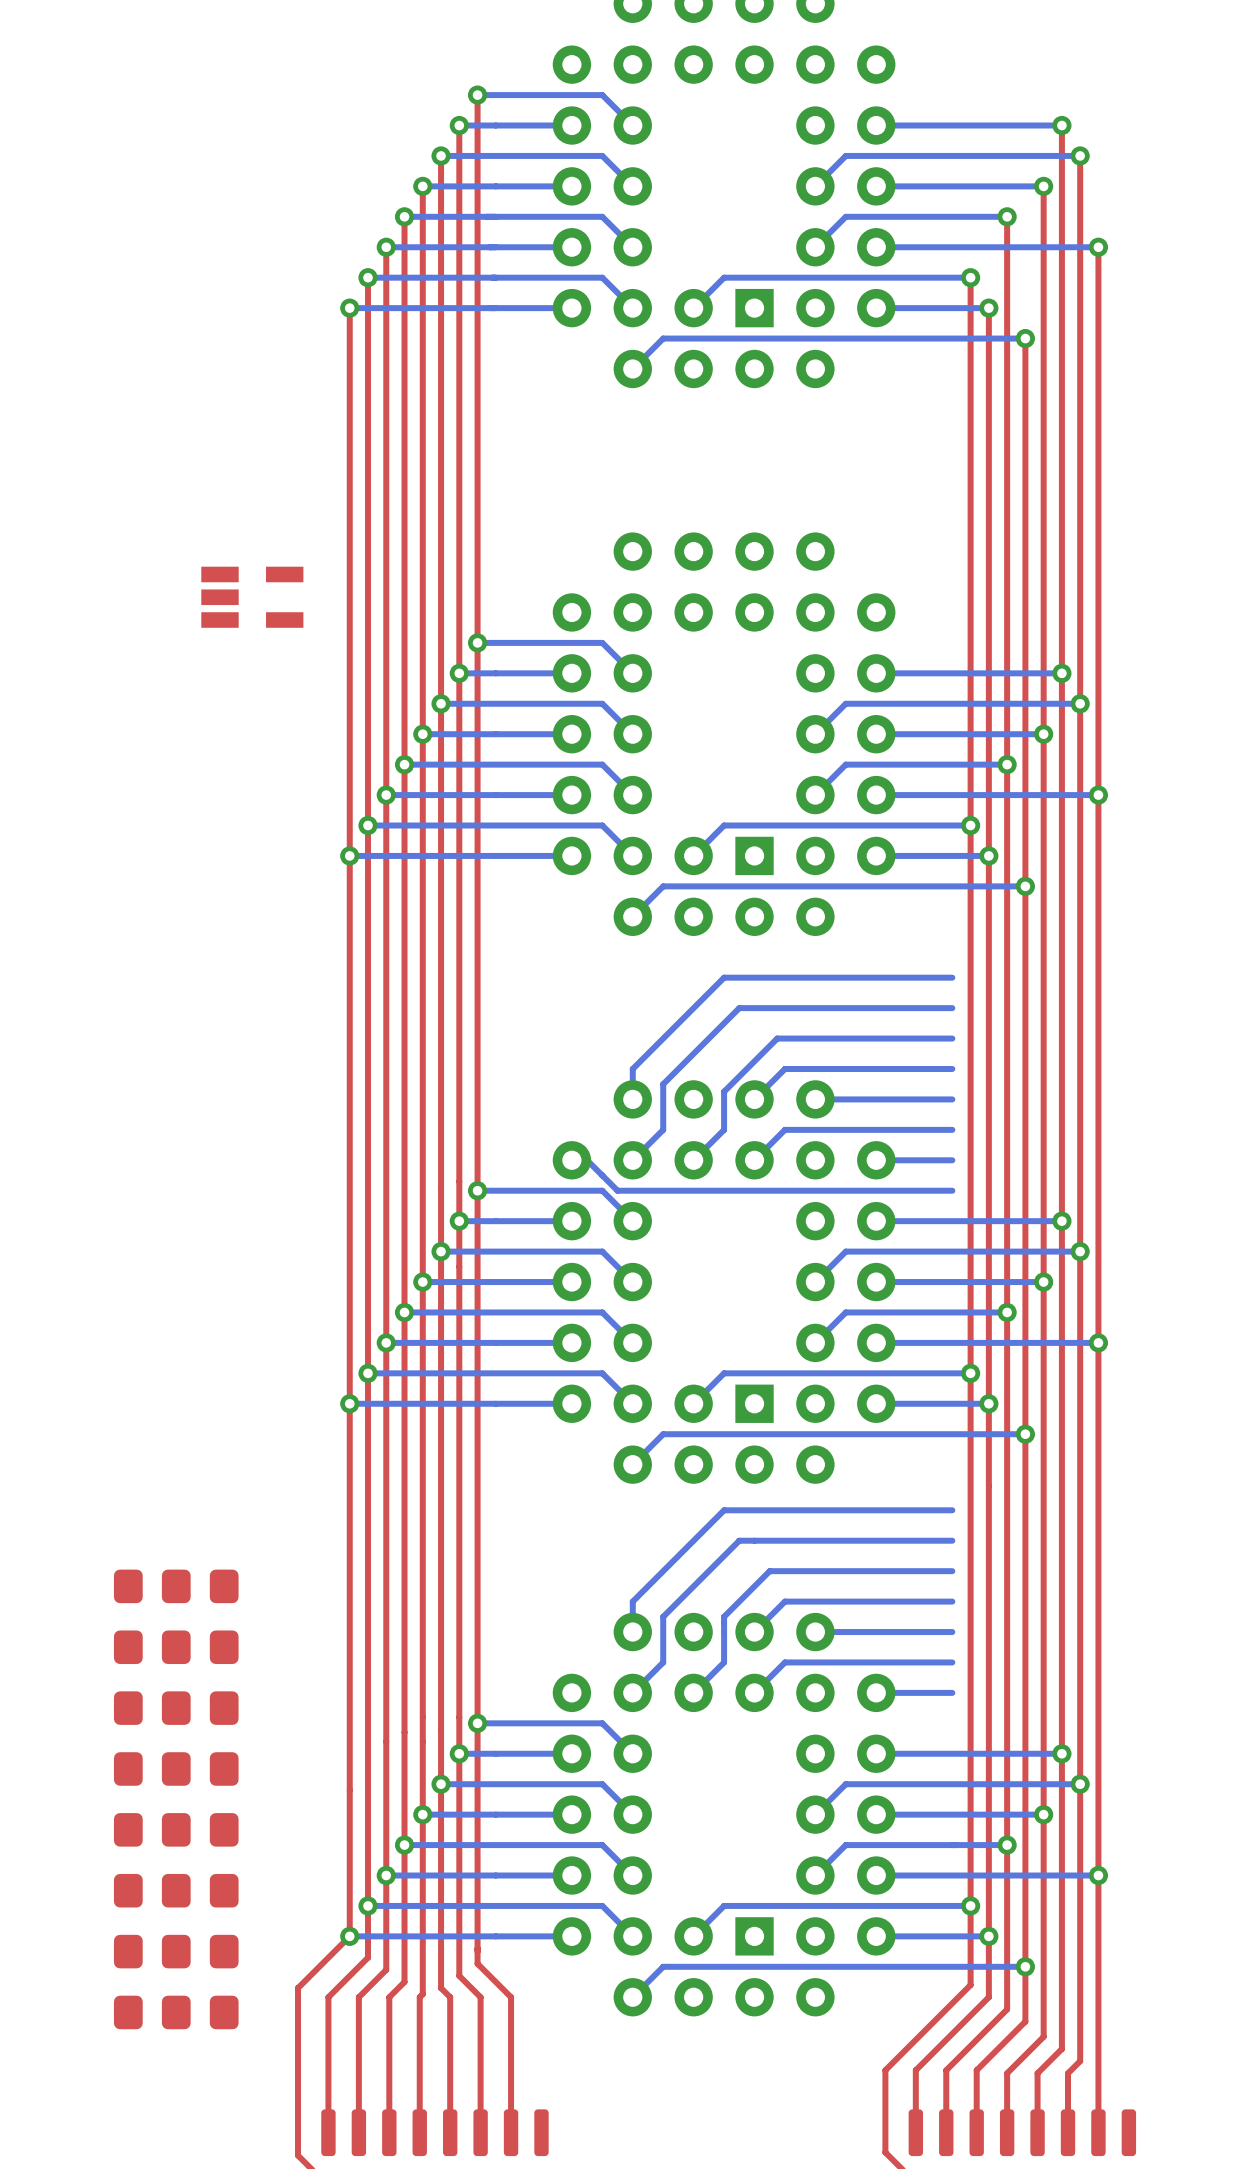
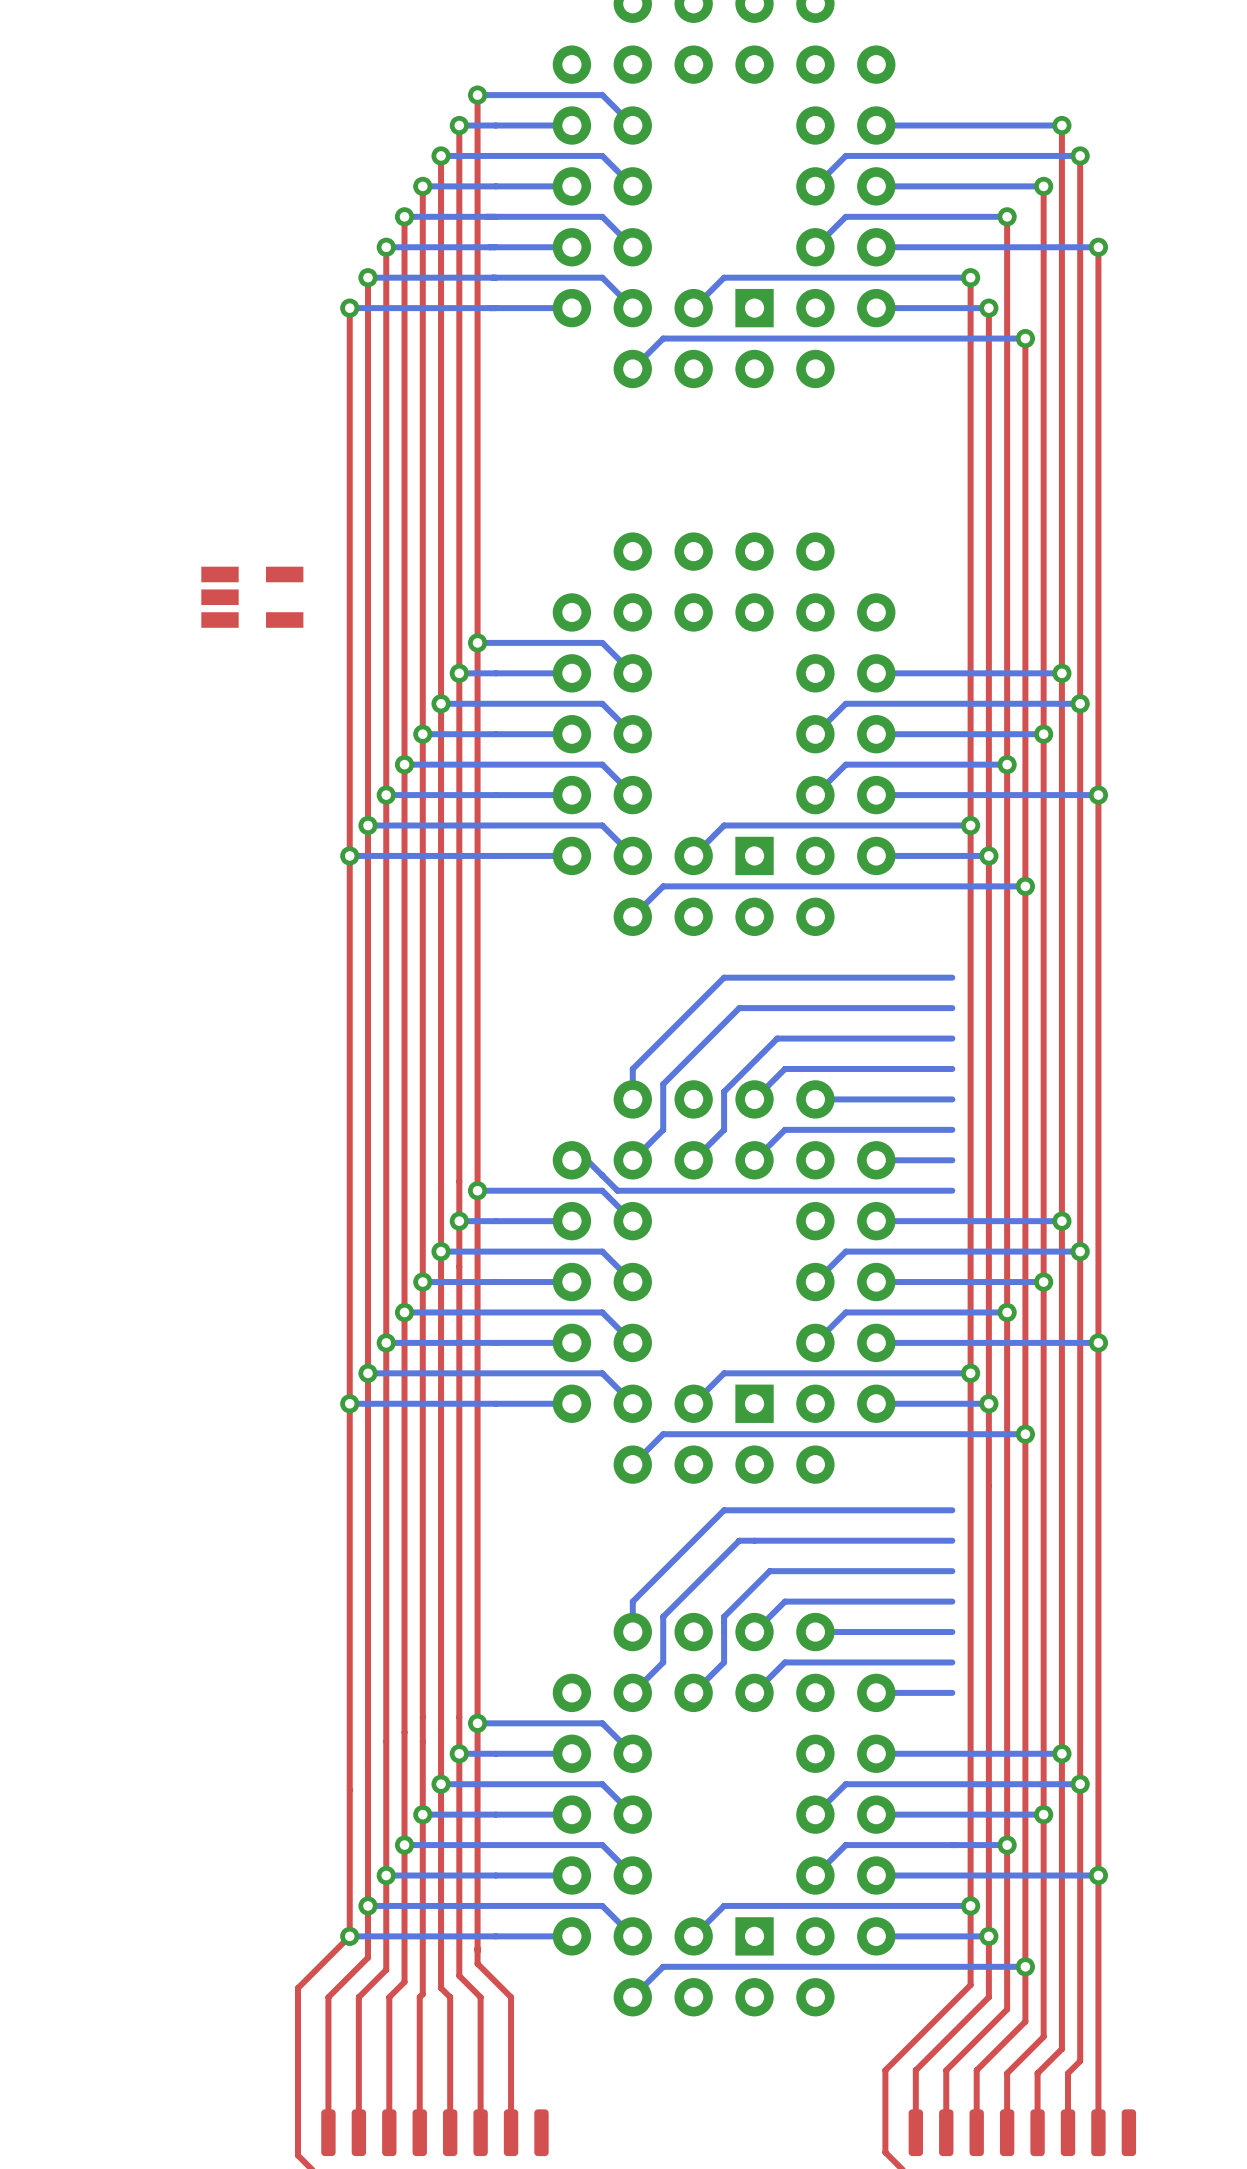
part: (176, 1586) -> none
part: (176, 1647) -> none
part: (176, 1708) -> none
part: (176, 1768) -> none
part: (176, 1829) -> none
part: (176, 1890) -> none
part: (176, 1951) -> none
part: (176, 2012) -> none

